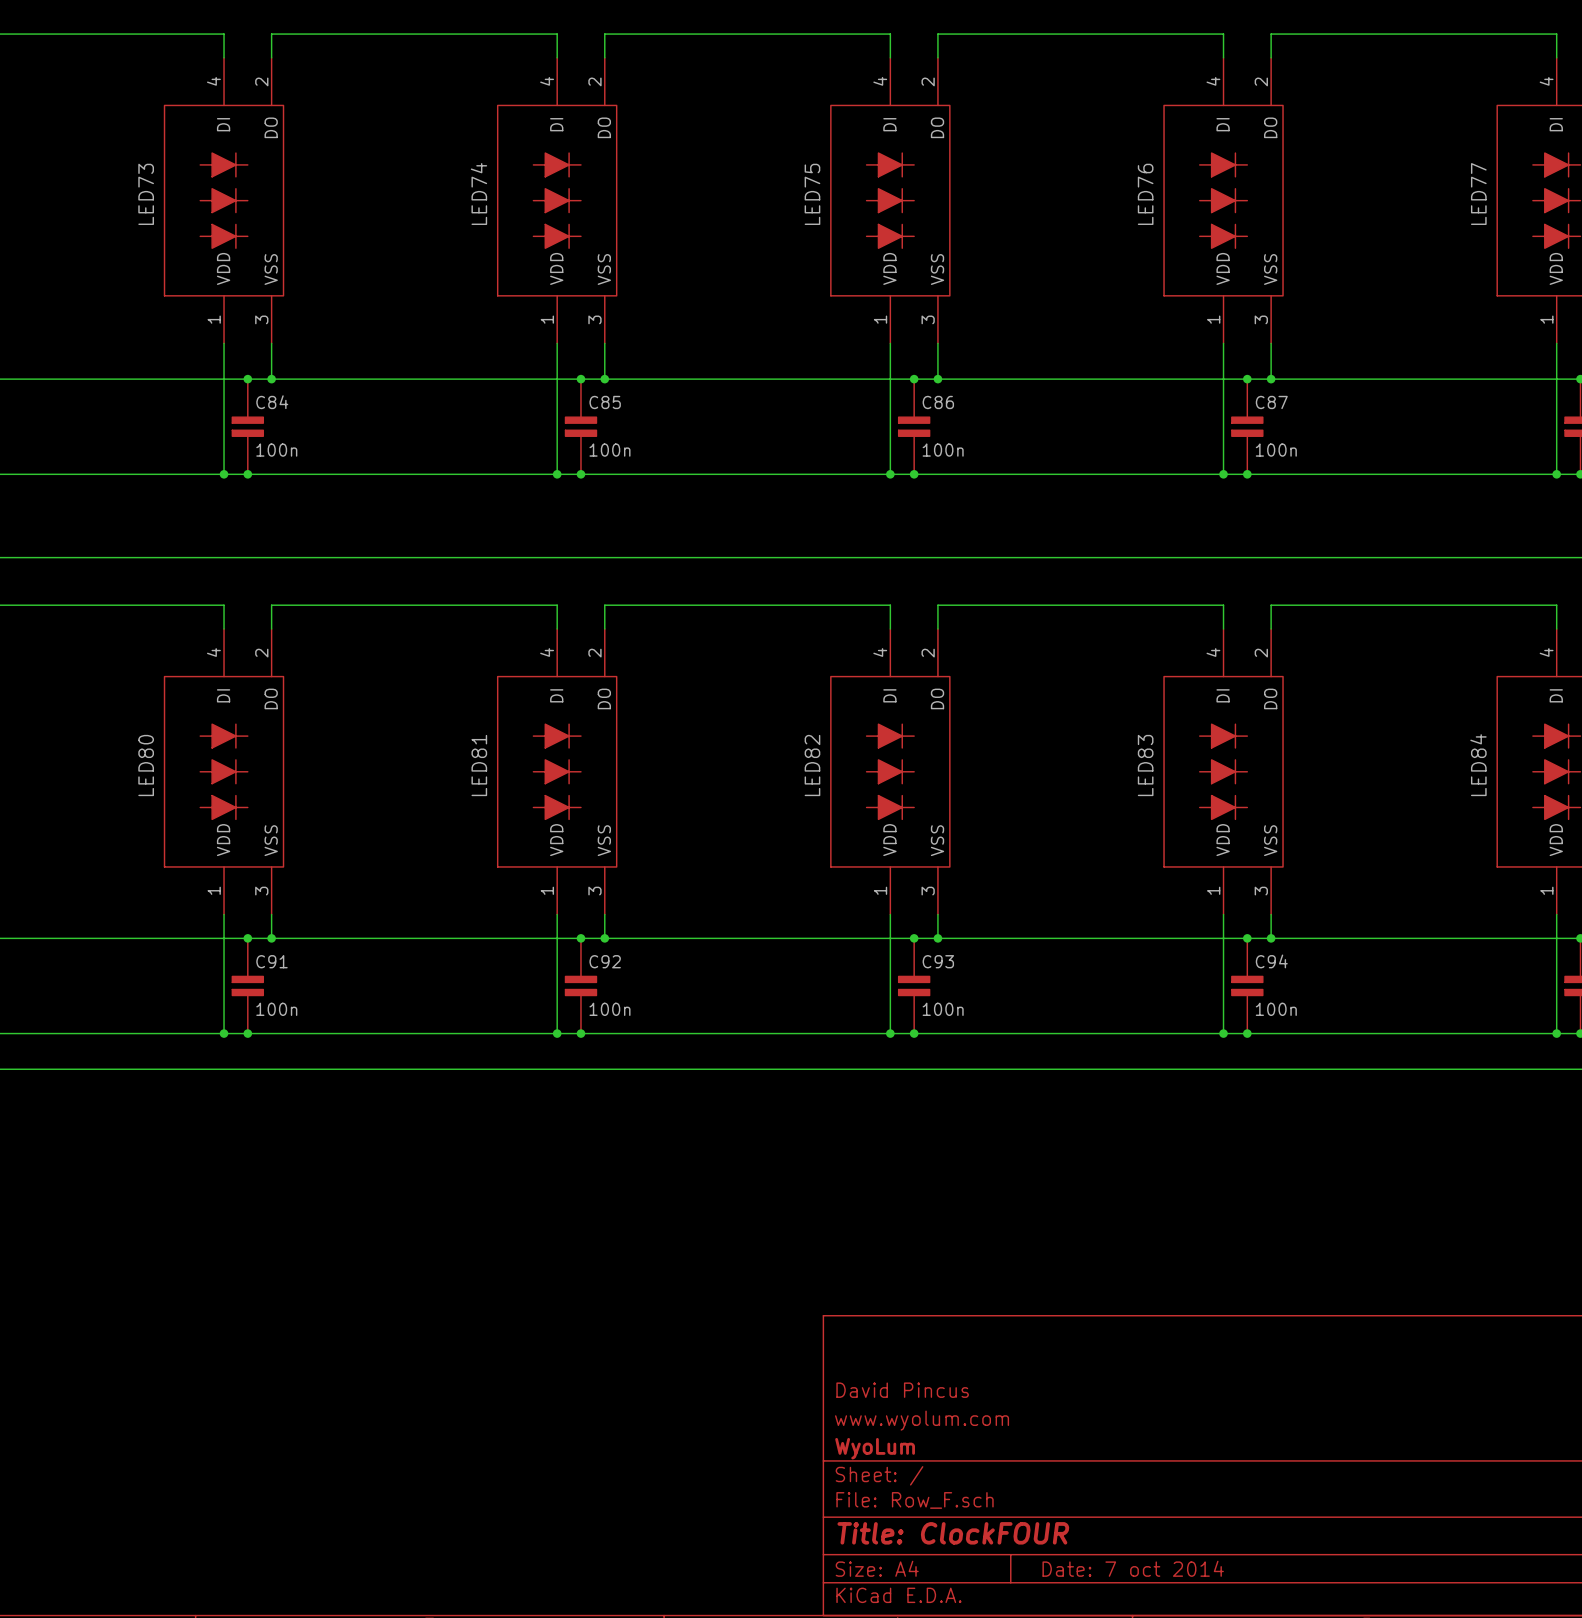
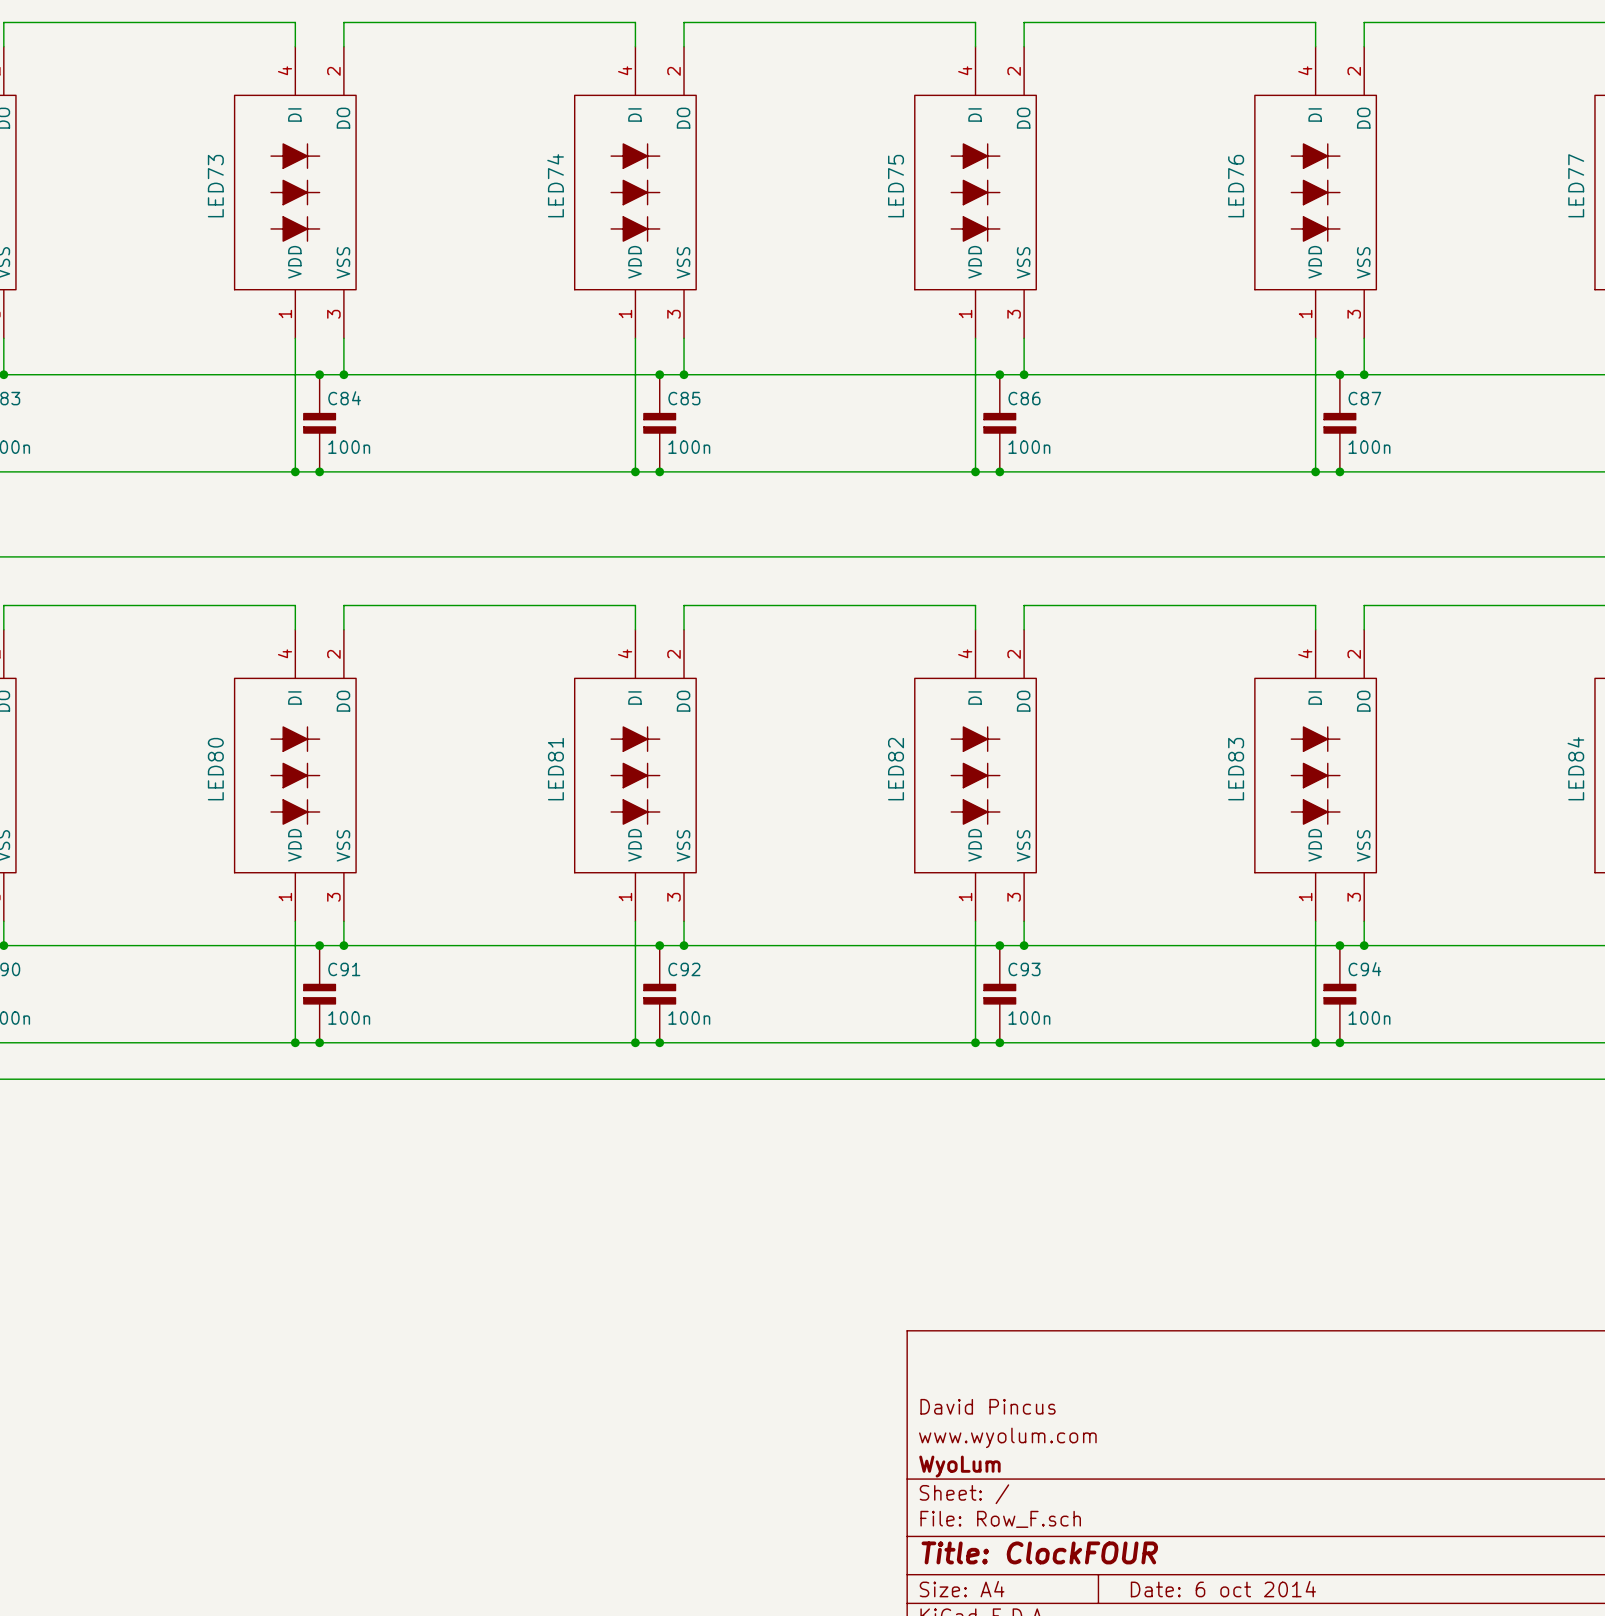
title block: Date: 7 oct 2014 (1133, 1568) -> Date: 6 oct 2014 (1223, 1589)

